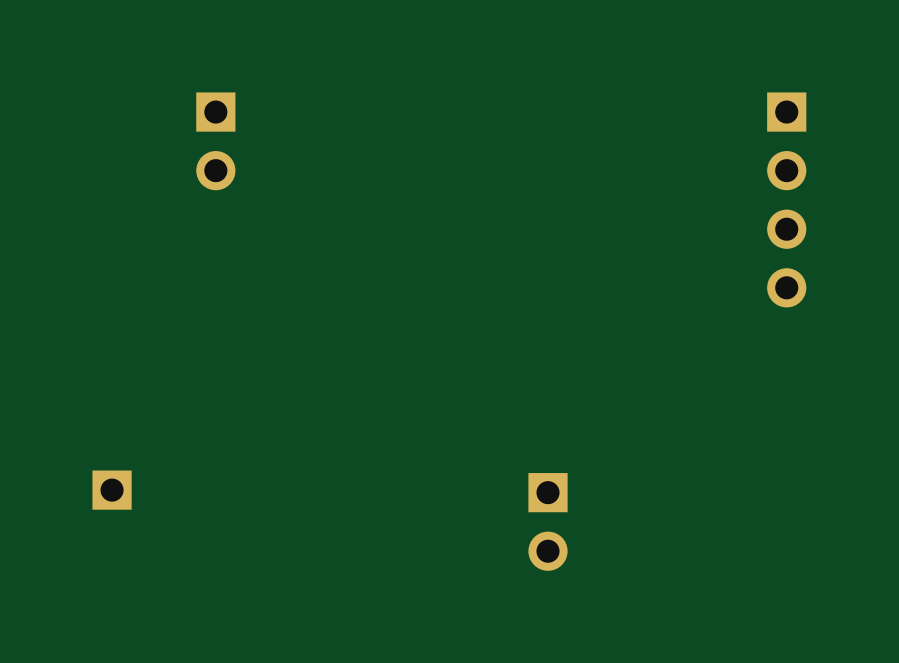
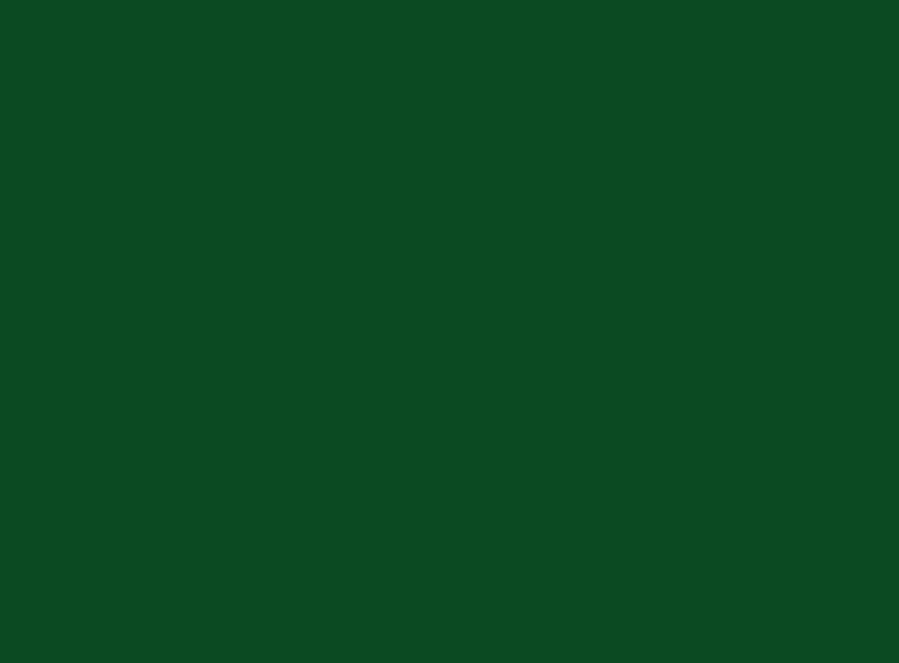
part: (215, 141) -> none
part: (786, 199) -> none
part: (112, 490) -> none
part: (548, 521) -> none

